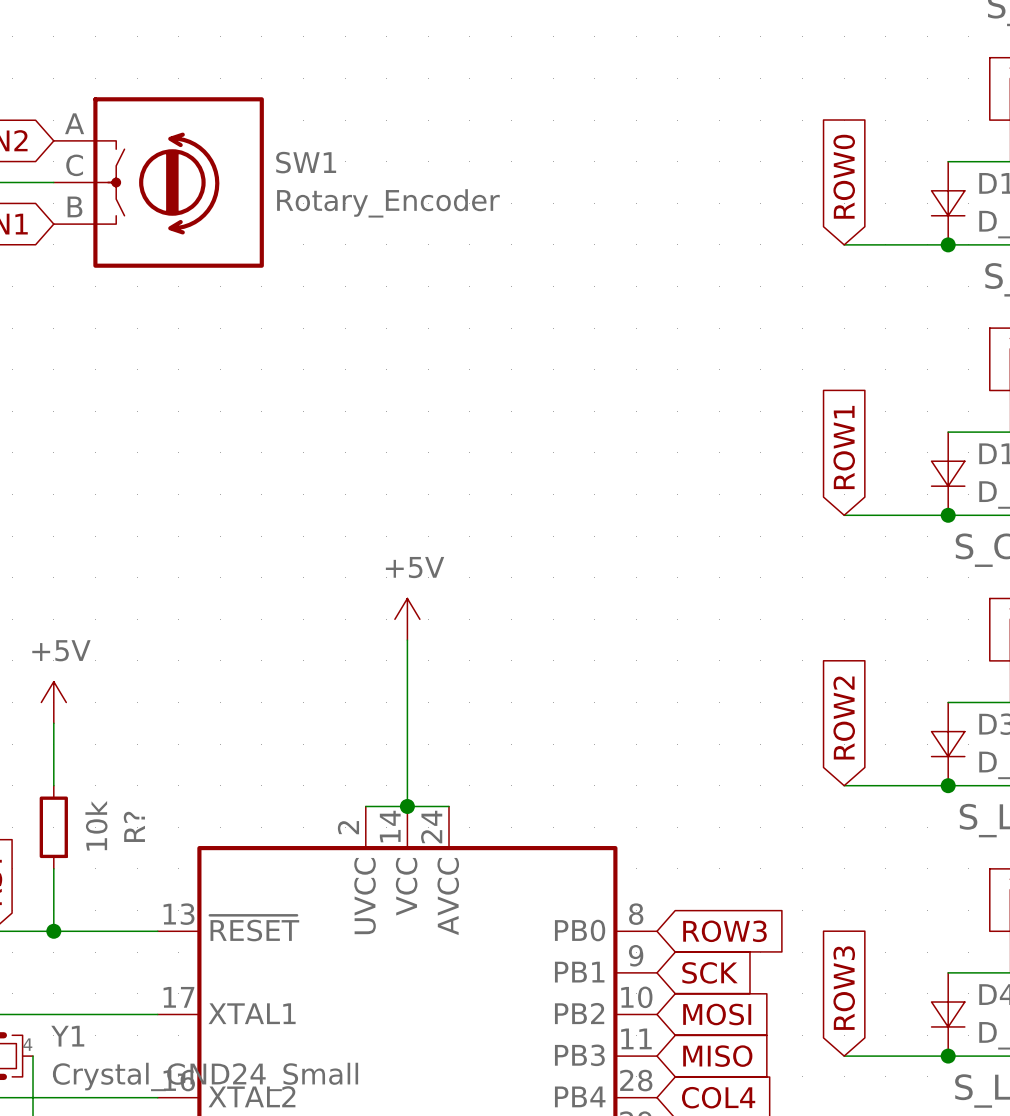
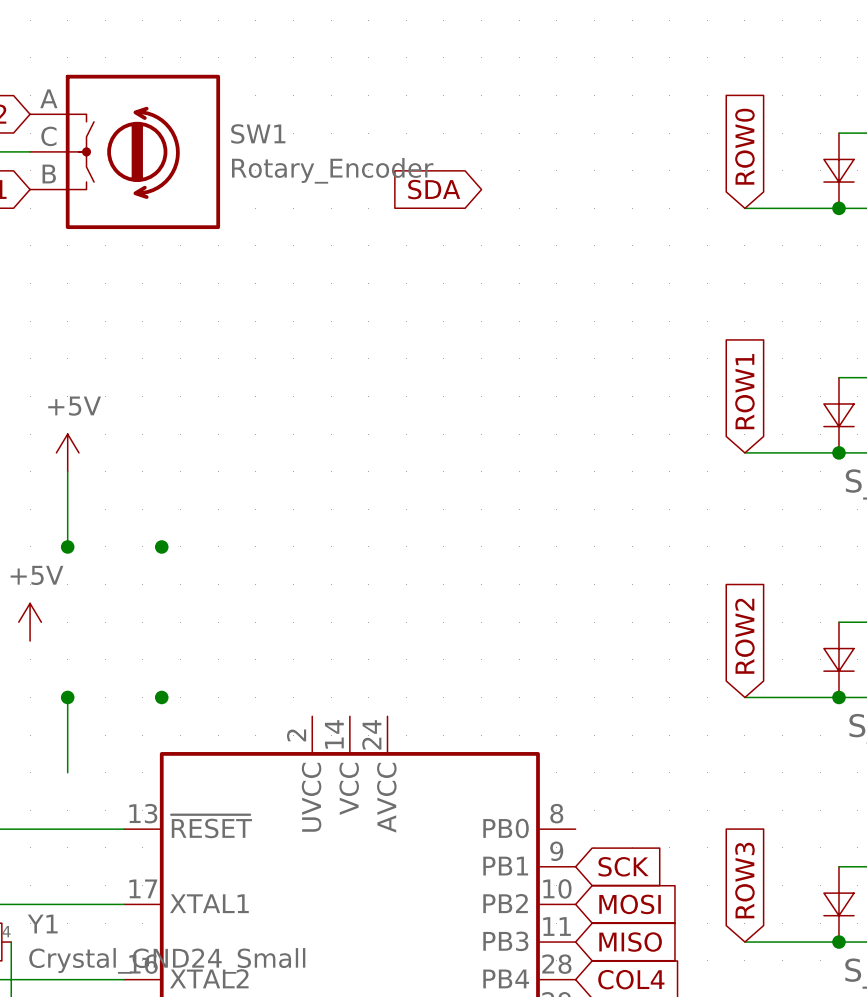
global label: none -> SDA (434, 189)
wire: none -> (67, 471) (67, 546)
junction: none -> (67, 546)
junction: none -> (161, 546)
power symbol position: +5V (407, 619) -> +5V (67, 452)
wire: (407, 640) (407, 806) -> none
wire: (53, 723) (53, 785) -> none
wire: none -> (67, 697) (67, 772)
junction: none -> (67, 697)
junction: none -> (161, 697)
wire: (365, 806) (449, 806) -> none
junction: (407, 806) -> none
R?: 10k (53, 827) -> none
wire: (53, 868) (53, 931) -> none
junction: (53, 931) -> none
global label: ROW3 (724, 931) -> none

